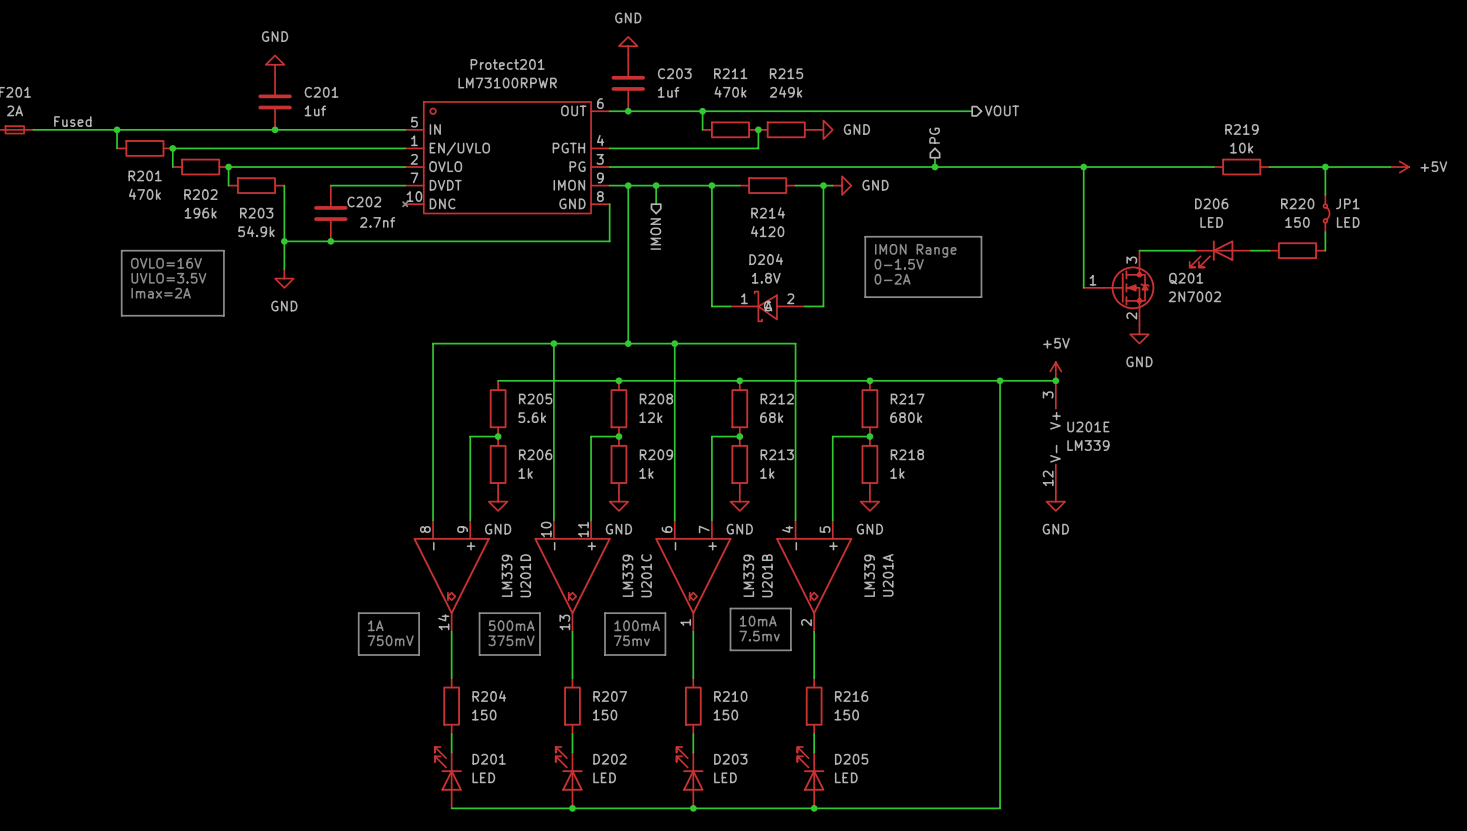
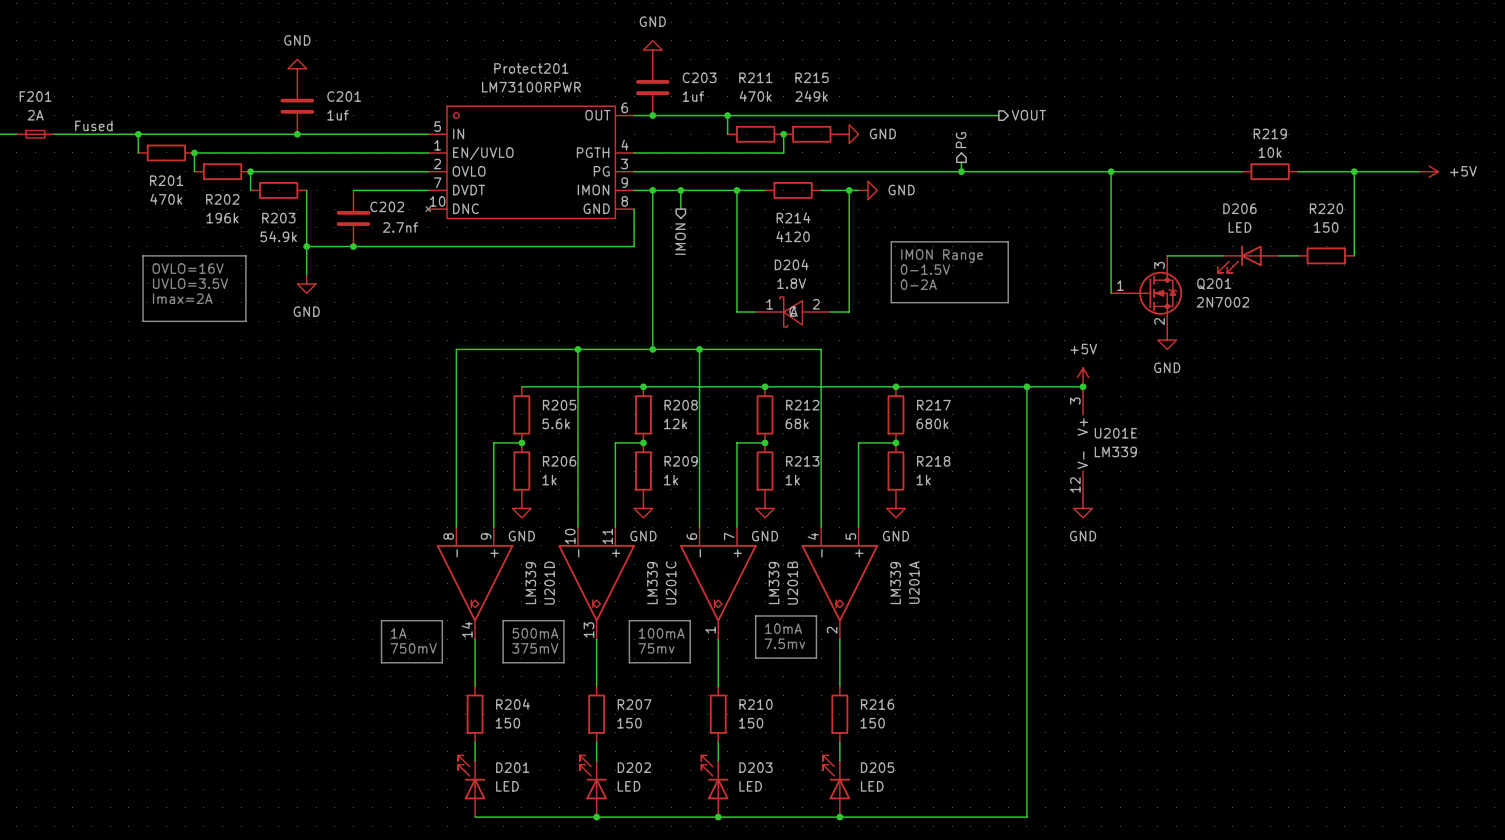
JP1: LED (1326, 213) -> none

